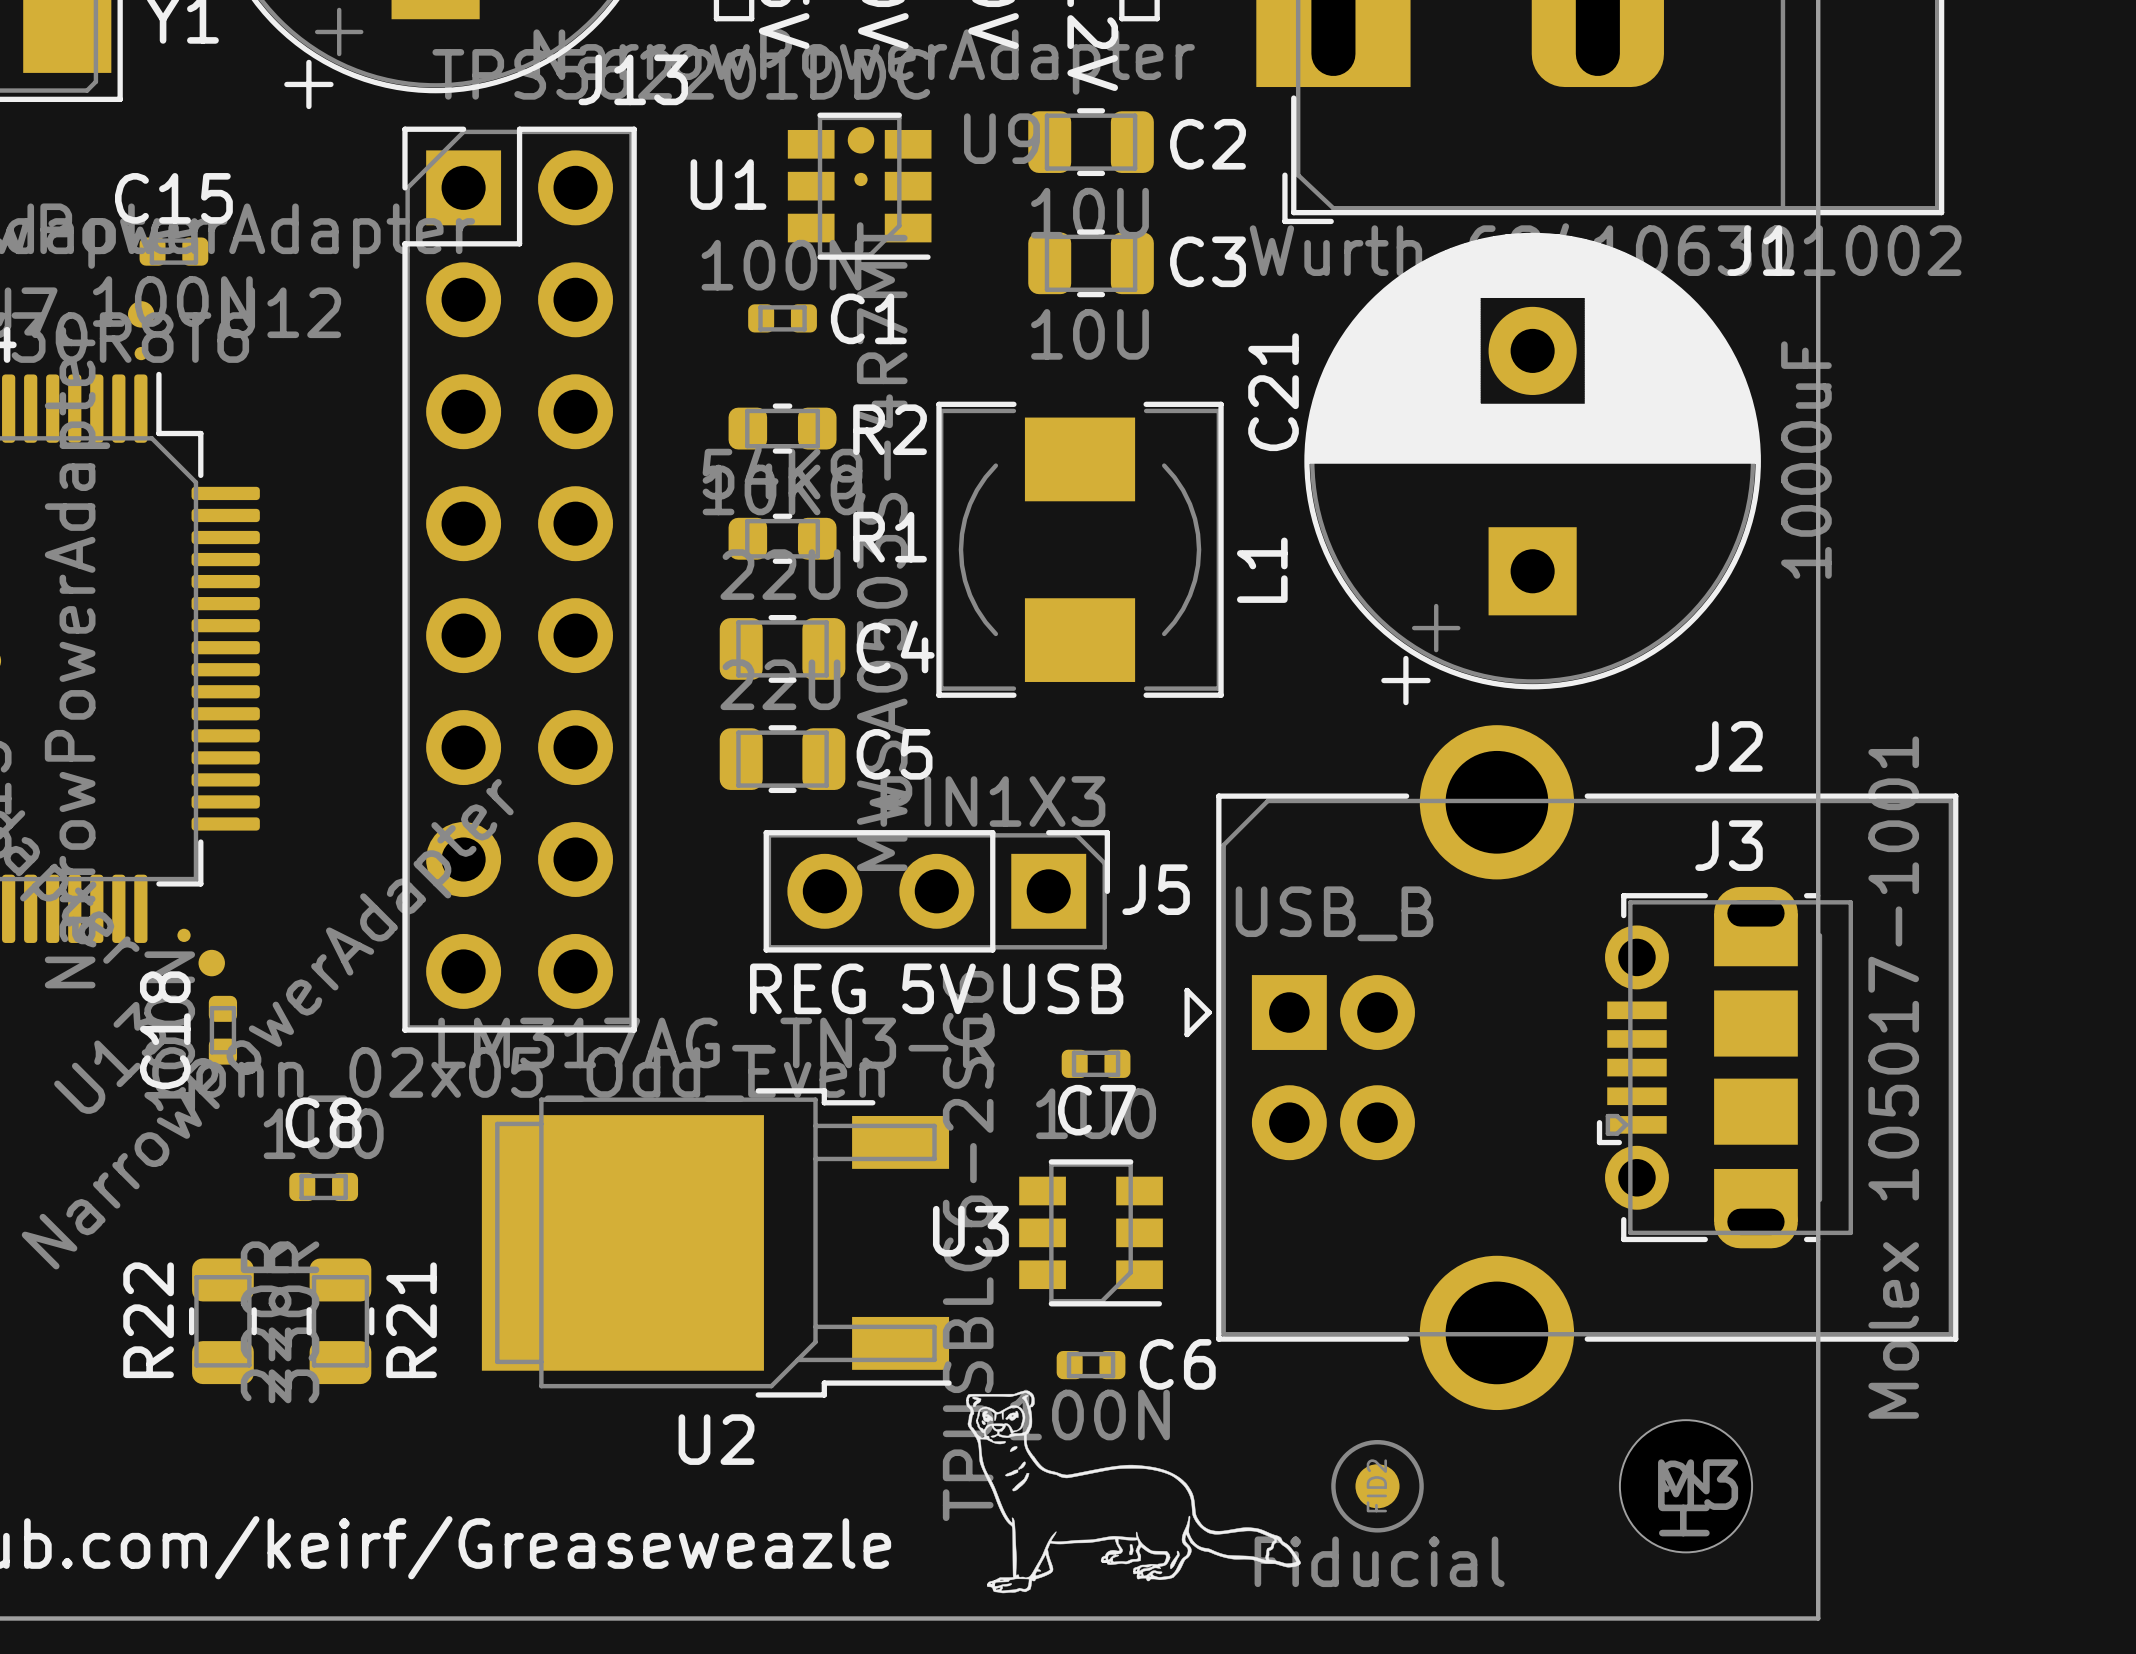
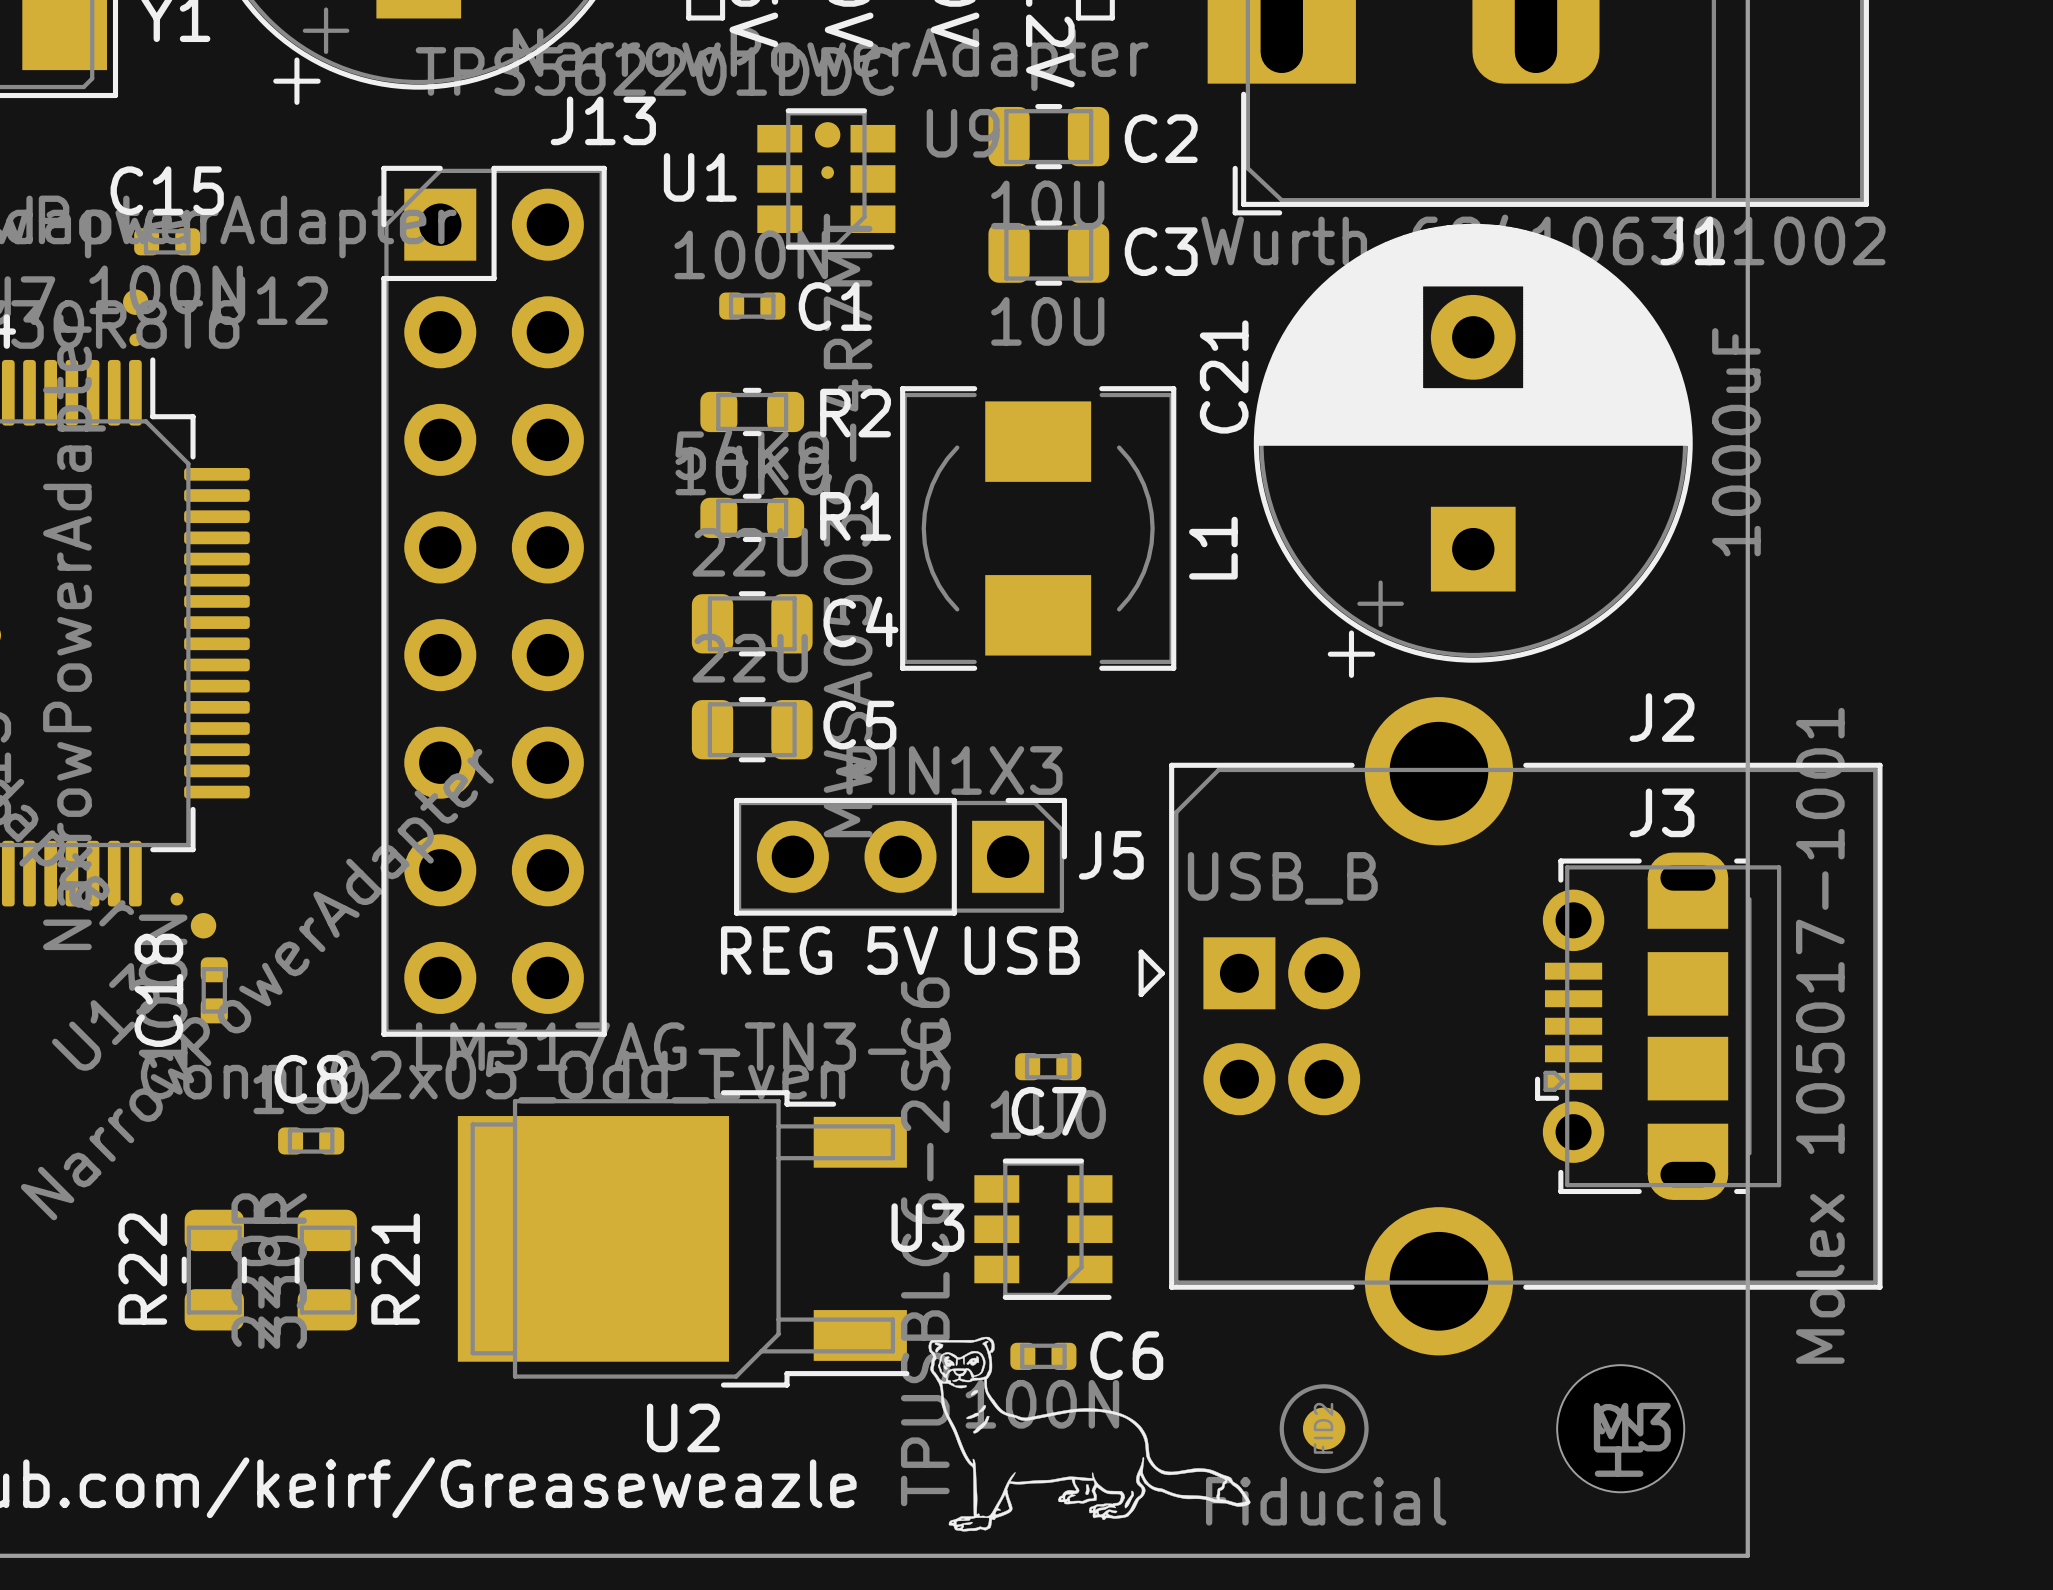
J13 position: (519, 579) -> (494, 601)
C7 position: (1096, 1063) -> (1048, 1066)
U3 position: (1091, 1232) -> (1043, 1229)
U2 position: (716, 1242) -> (683, 1238)
C6 position: (1091, 1365) -> (1043, 1356)

